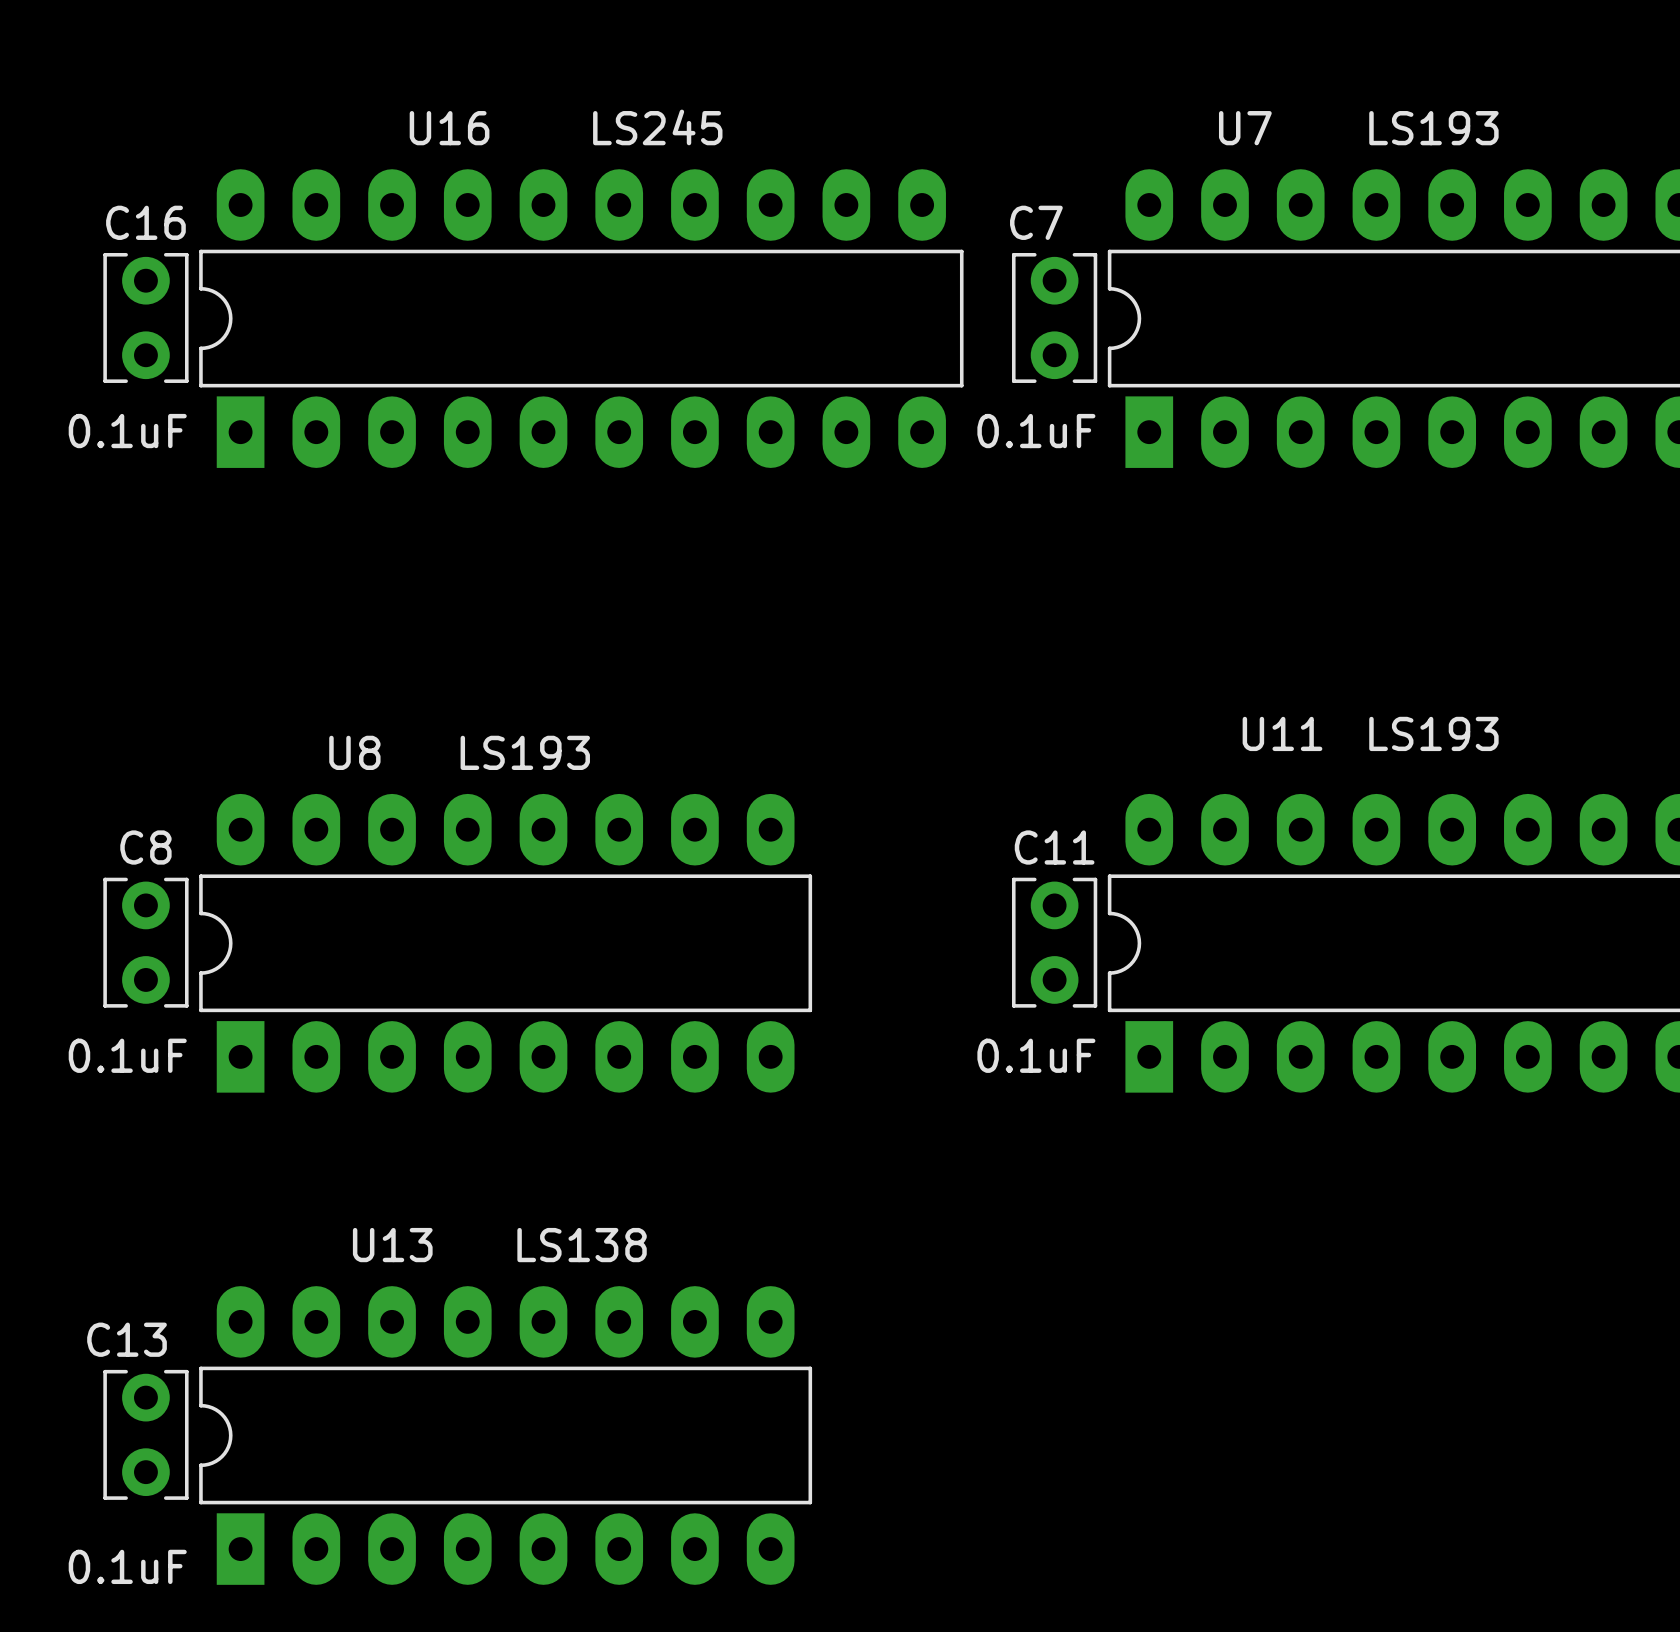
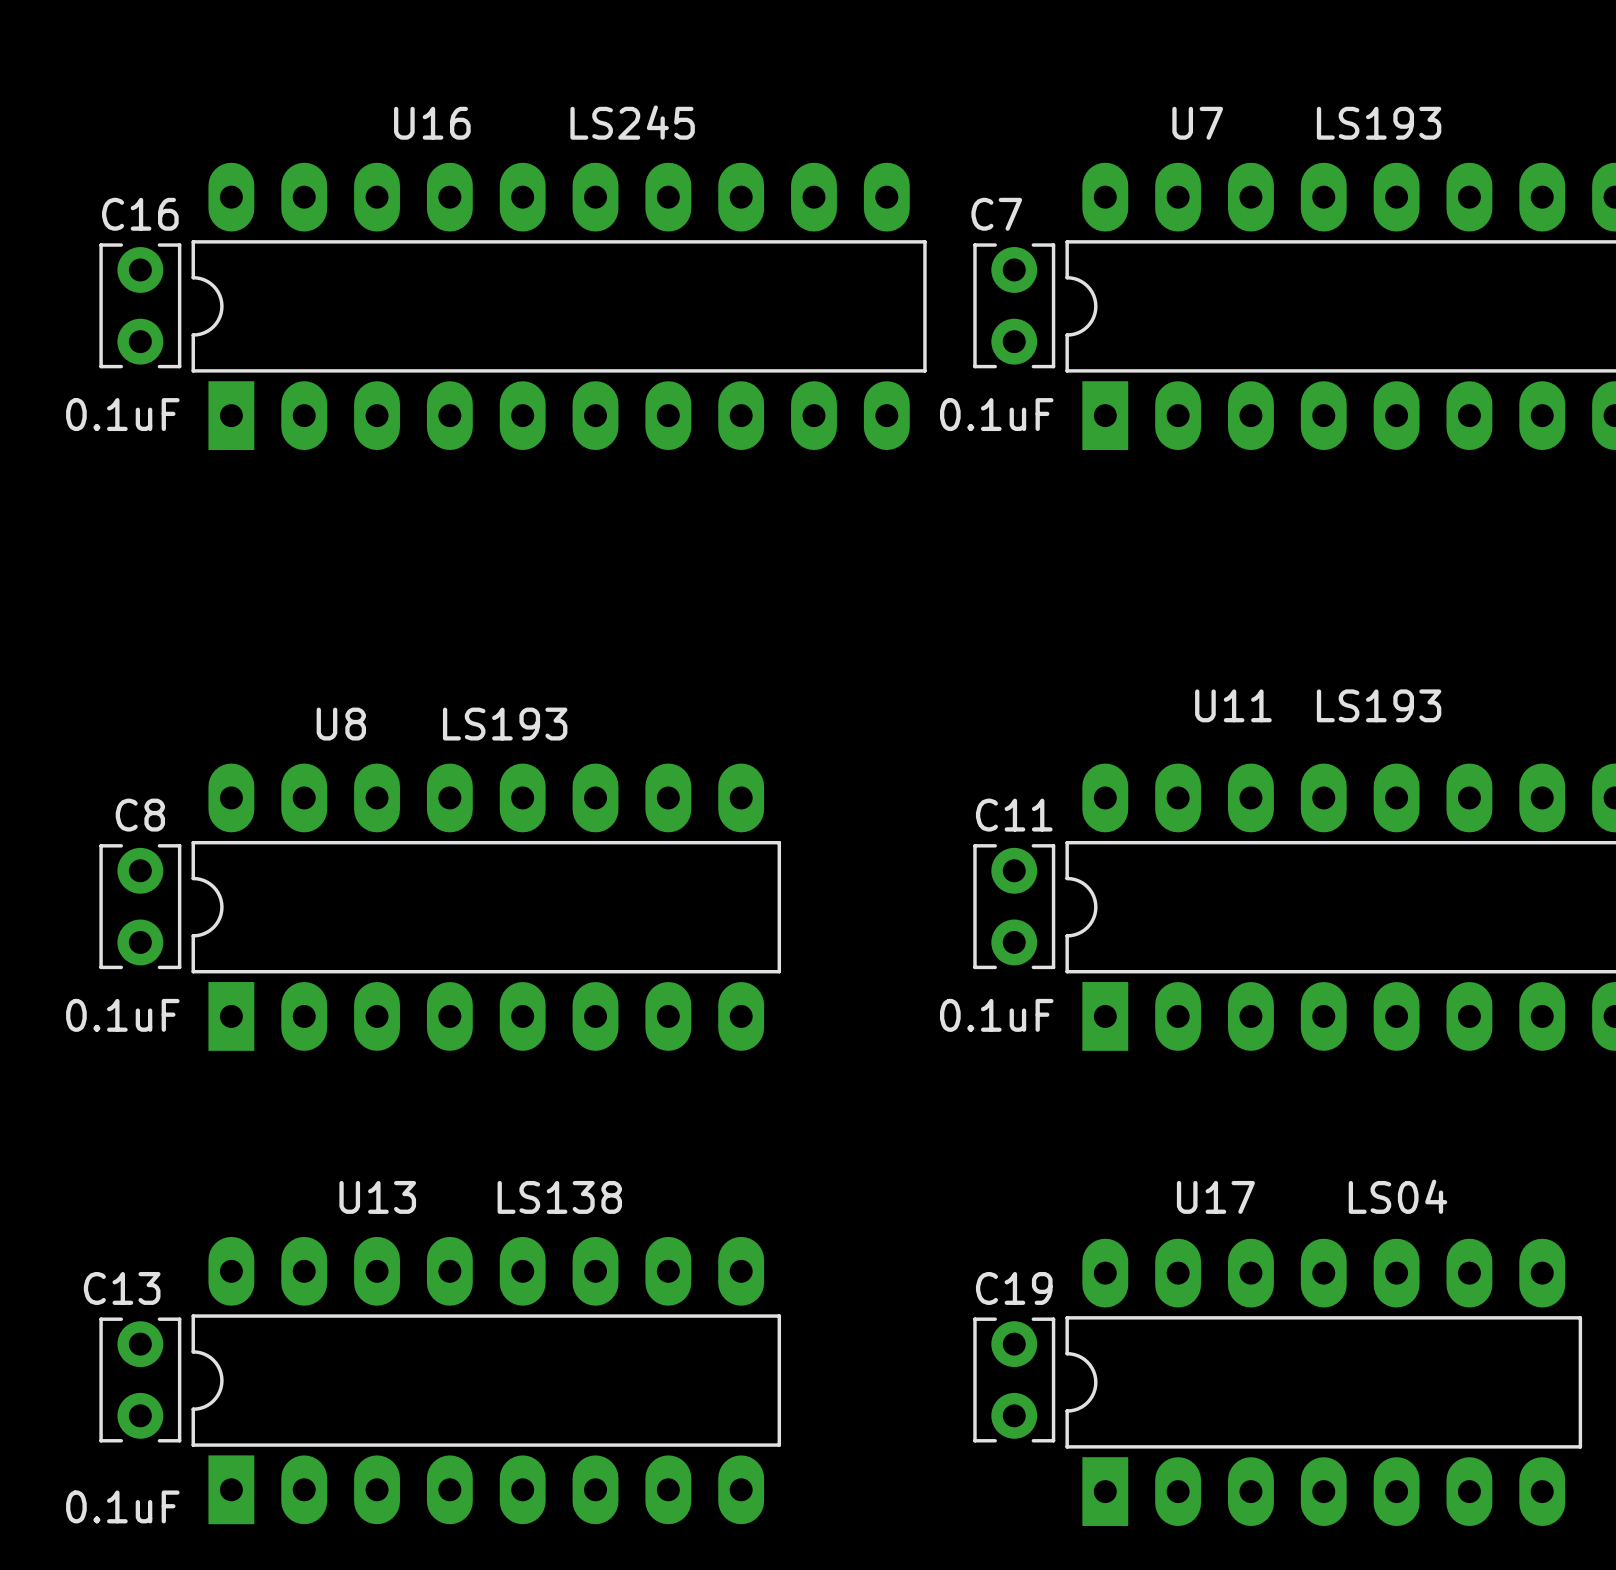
text: none -> LS04 (1397, 1196)
C19: none -> (1014, 1379)
U17: none -> (1323, 1382)

